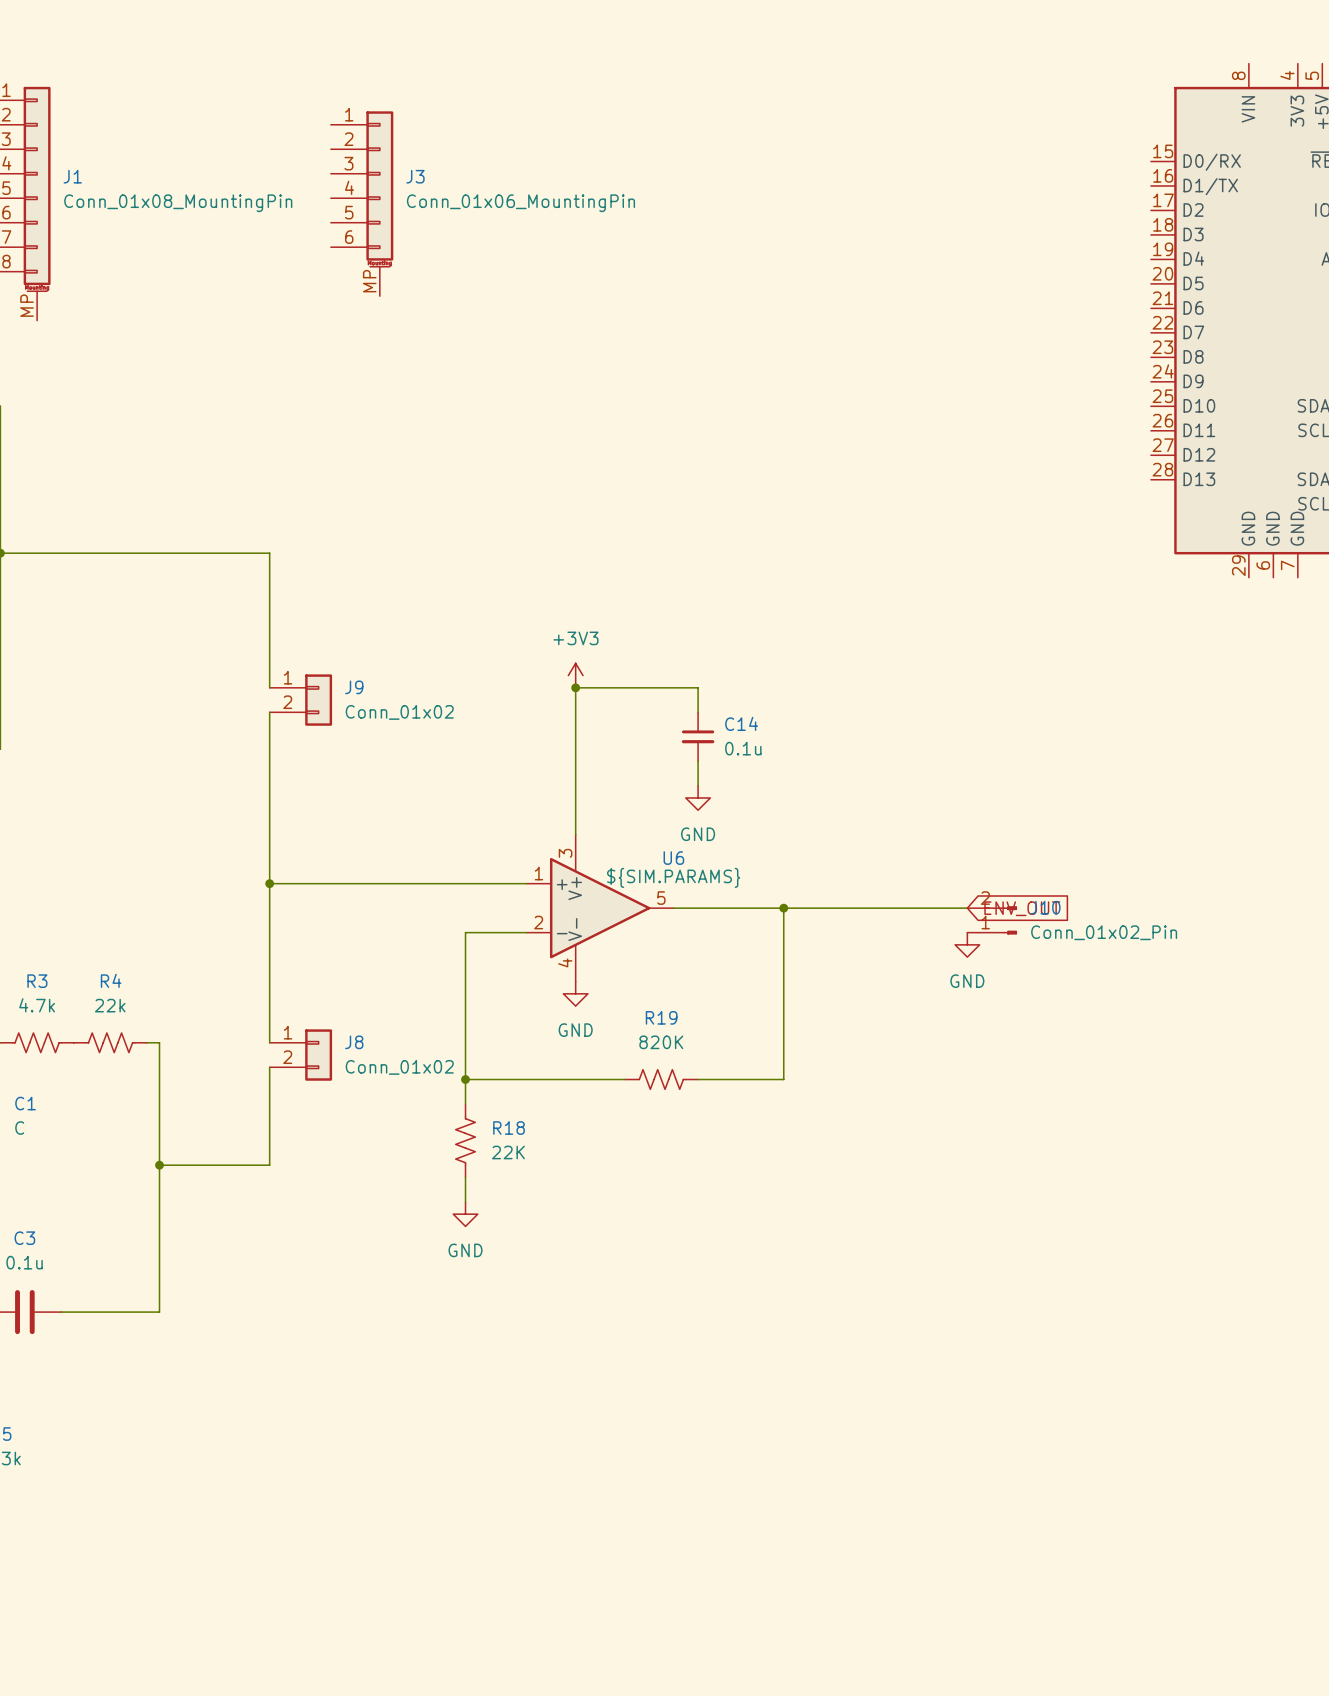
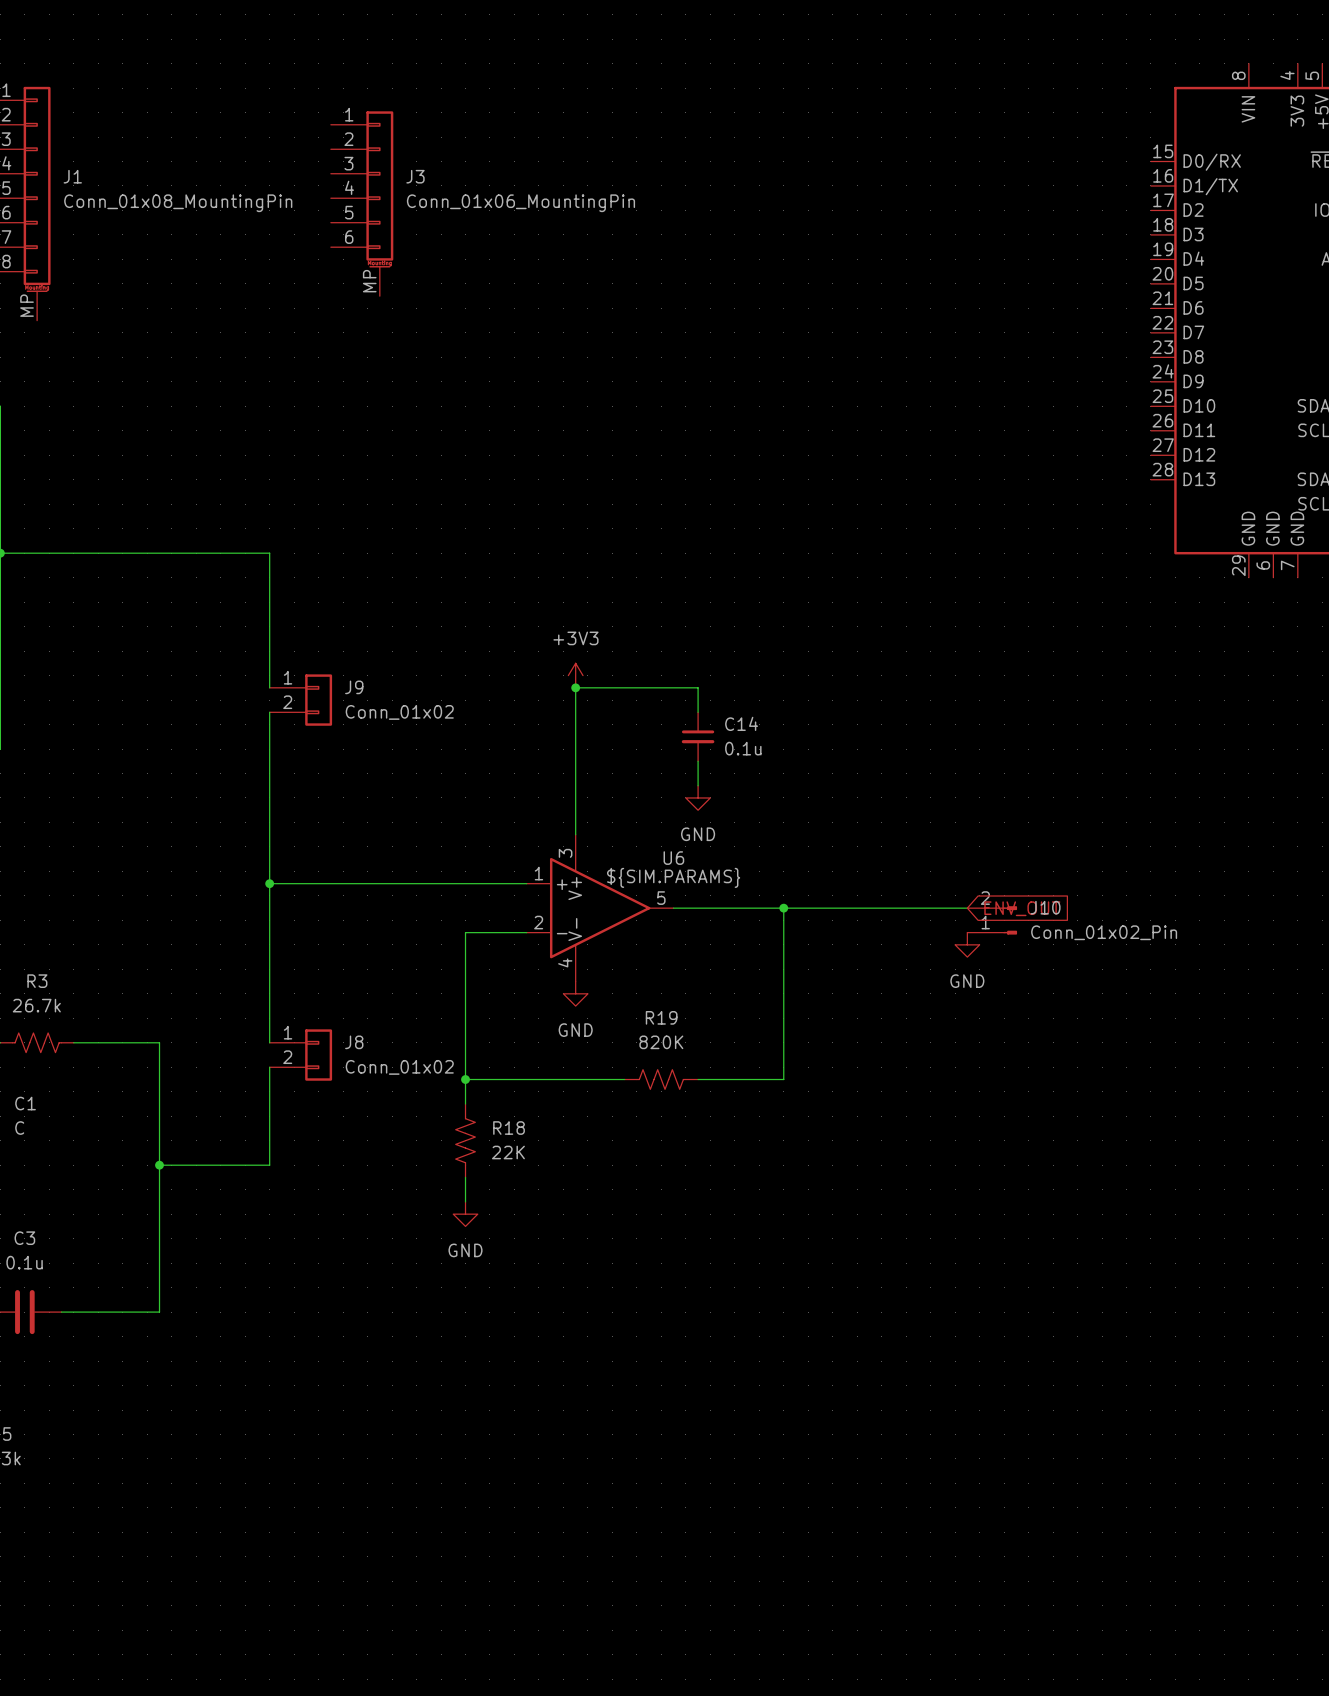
R3 value: 4.7k (37, 1005) -> 26.7k (36, 1005)
R4: 22k (110, 1042) -> none

